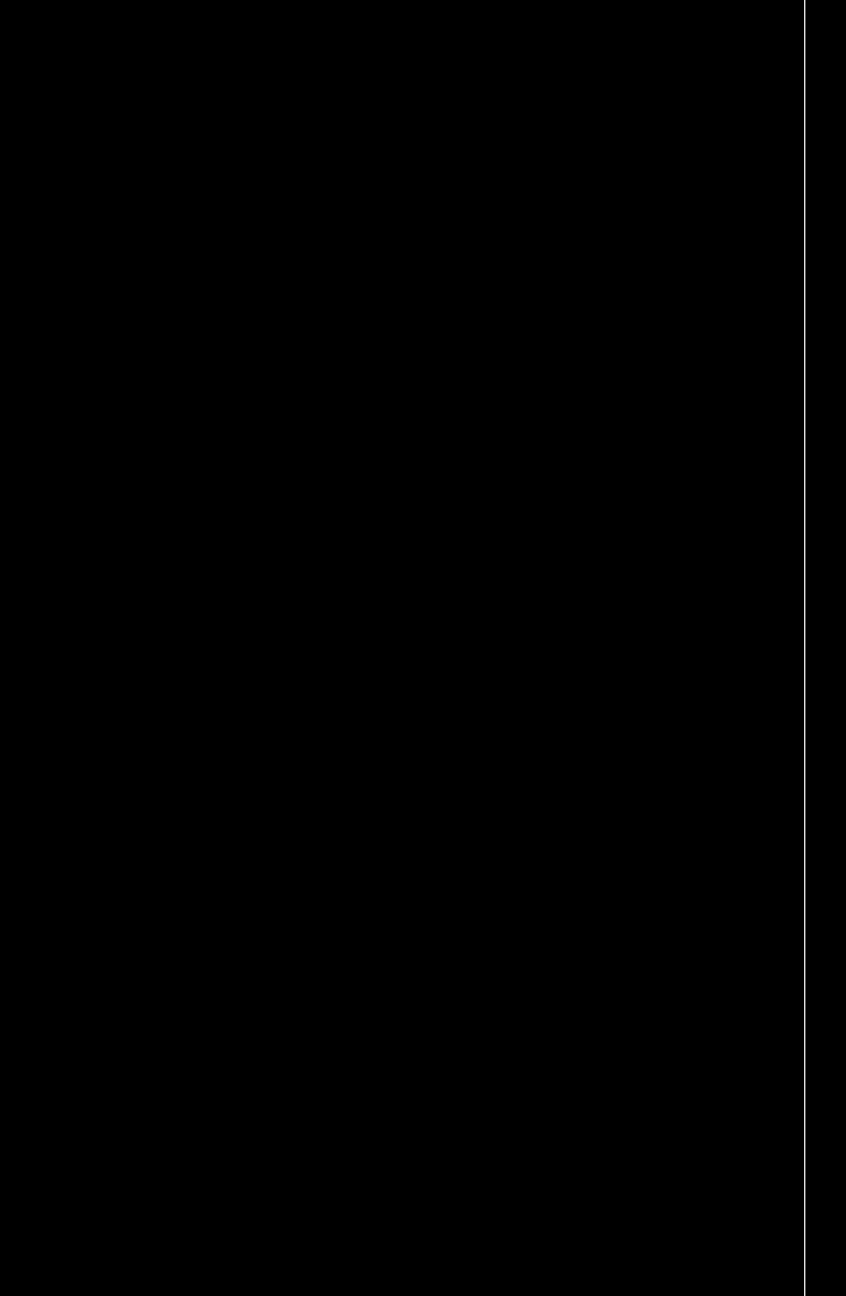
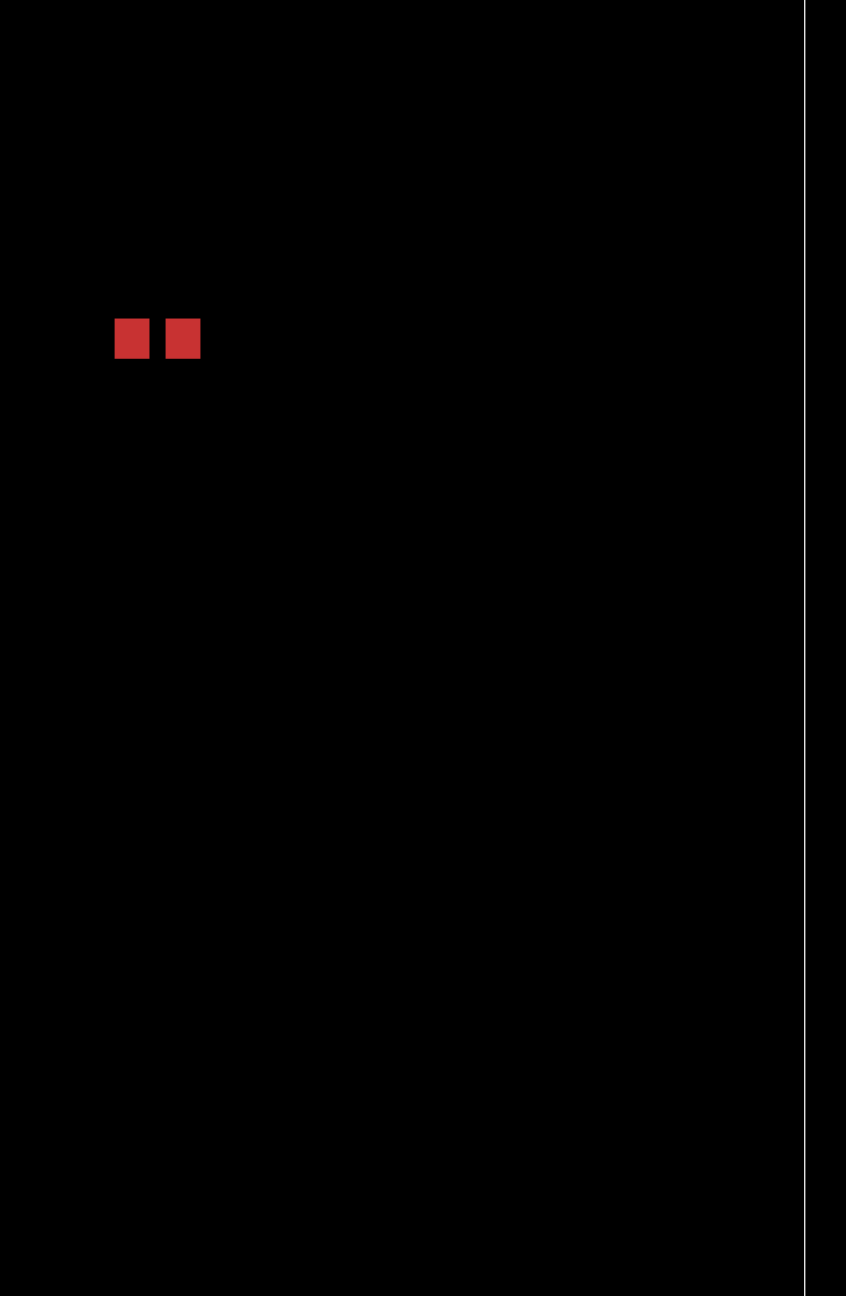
part: none -> (157, 338)

